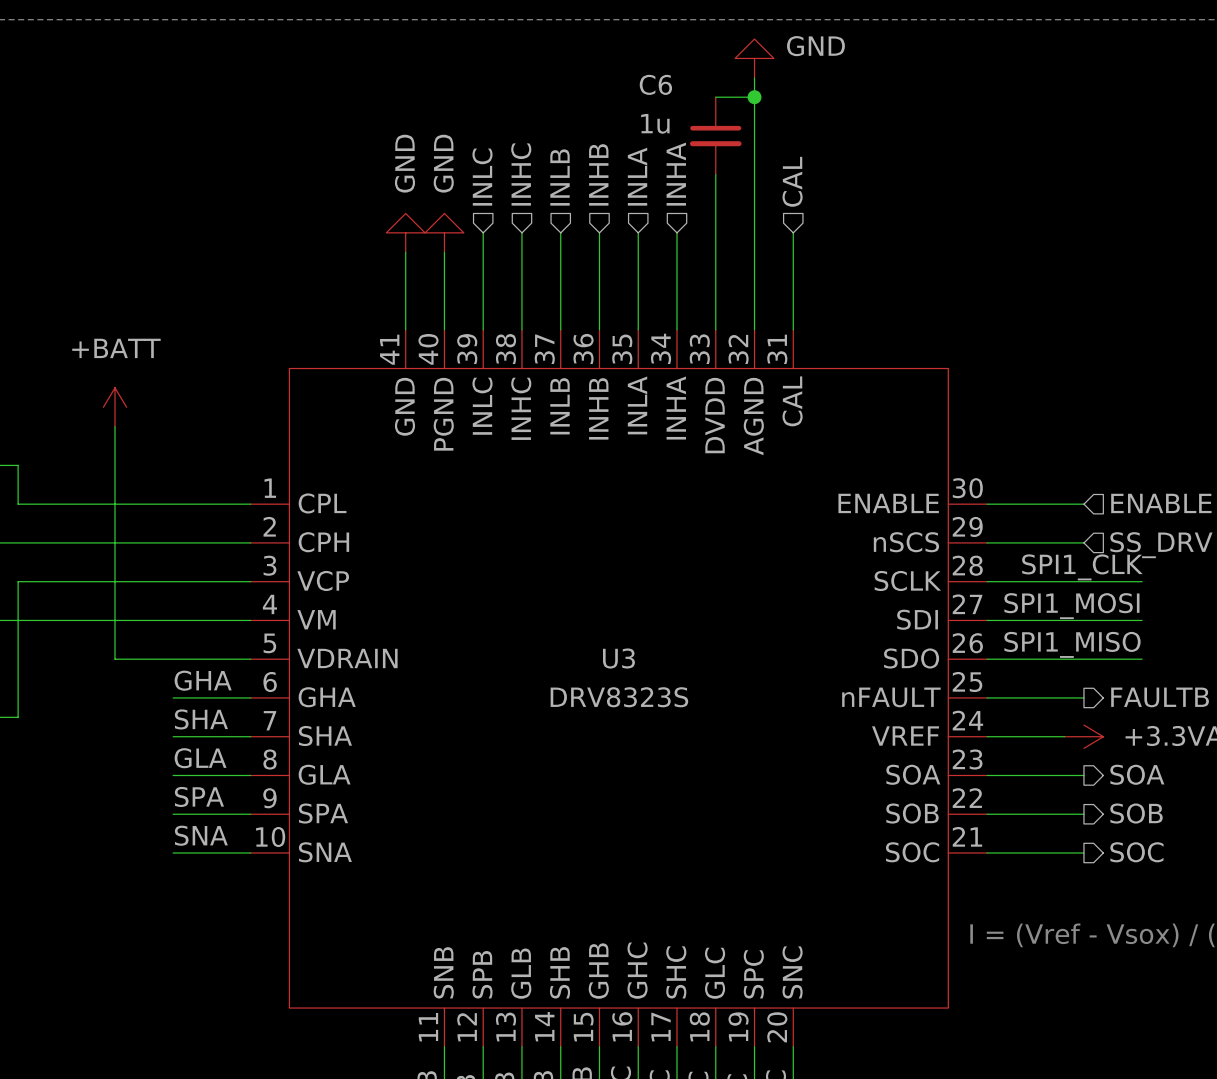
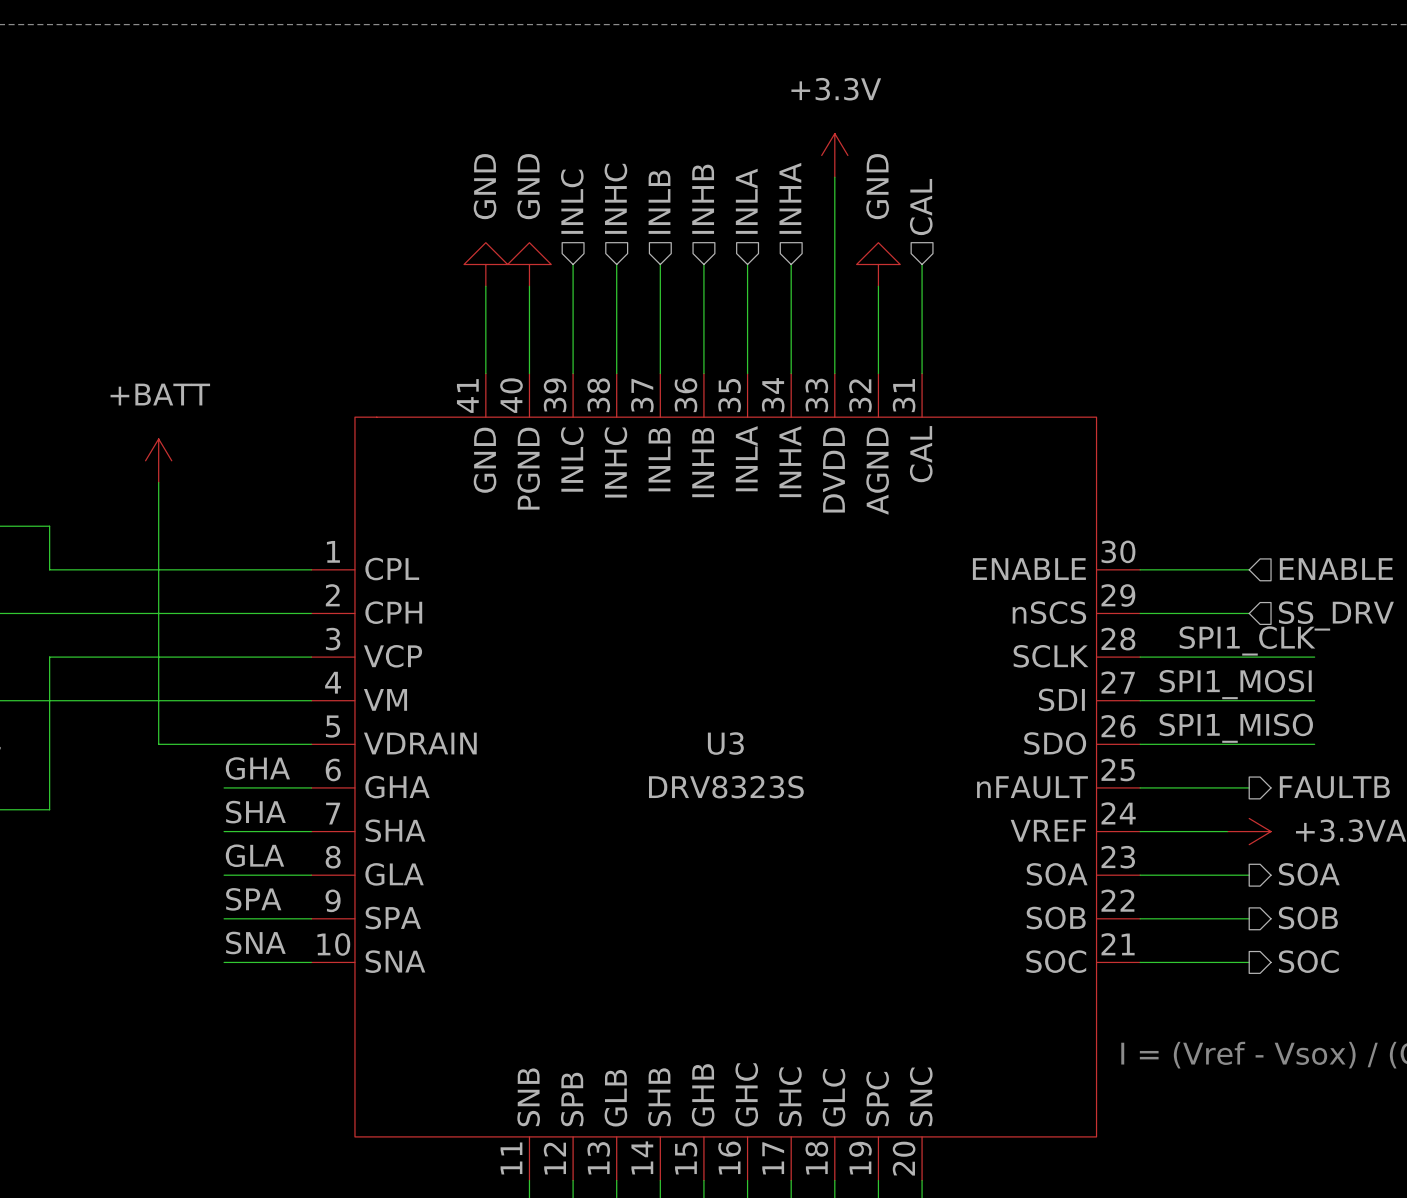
power symbol text rotation: 0° (815, 46) -> 90° counterclockwise (877, 186)
power symbol text position: GND (815, 46) -> GND (877, 186)
power symbol position: GND (754, 58) -> GND (878, 264)
wire: (754, 77) (754, 252) -> none
wire: (715, 97) (754, 97) -> none
junction: (754, 97) -> none
C6: 1u (715, 135) -> none
power symbol: none -> +3.3V (834, 155)

